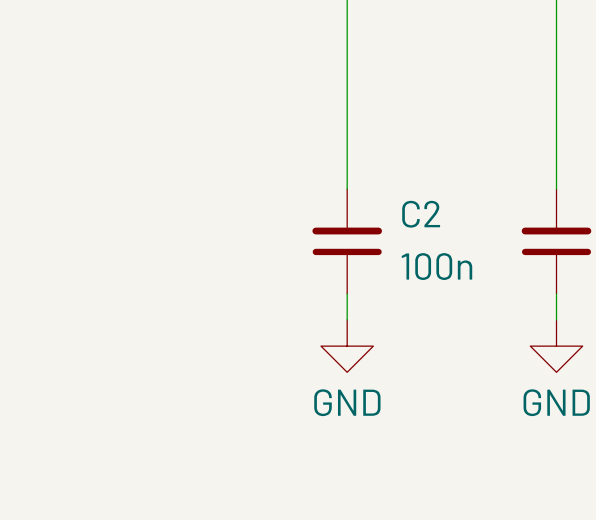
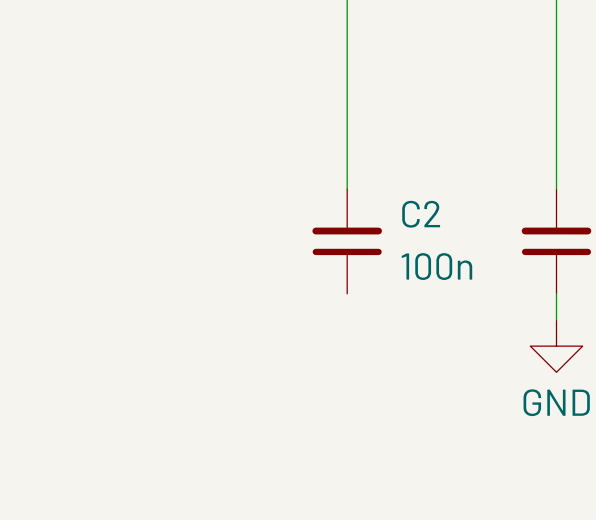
wire: (347, 293) (347, 319) -> none
power symbol: GND (347, 346) -> none

